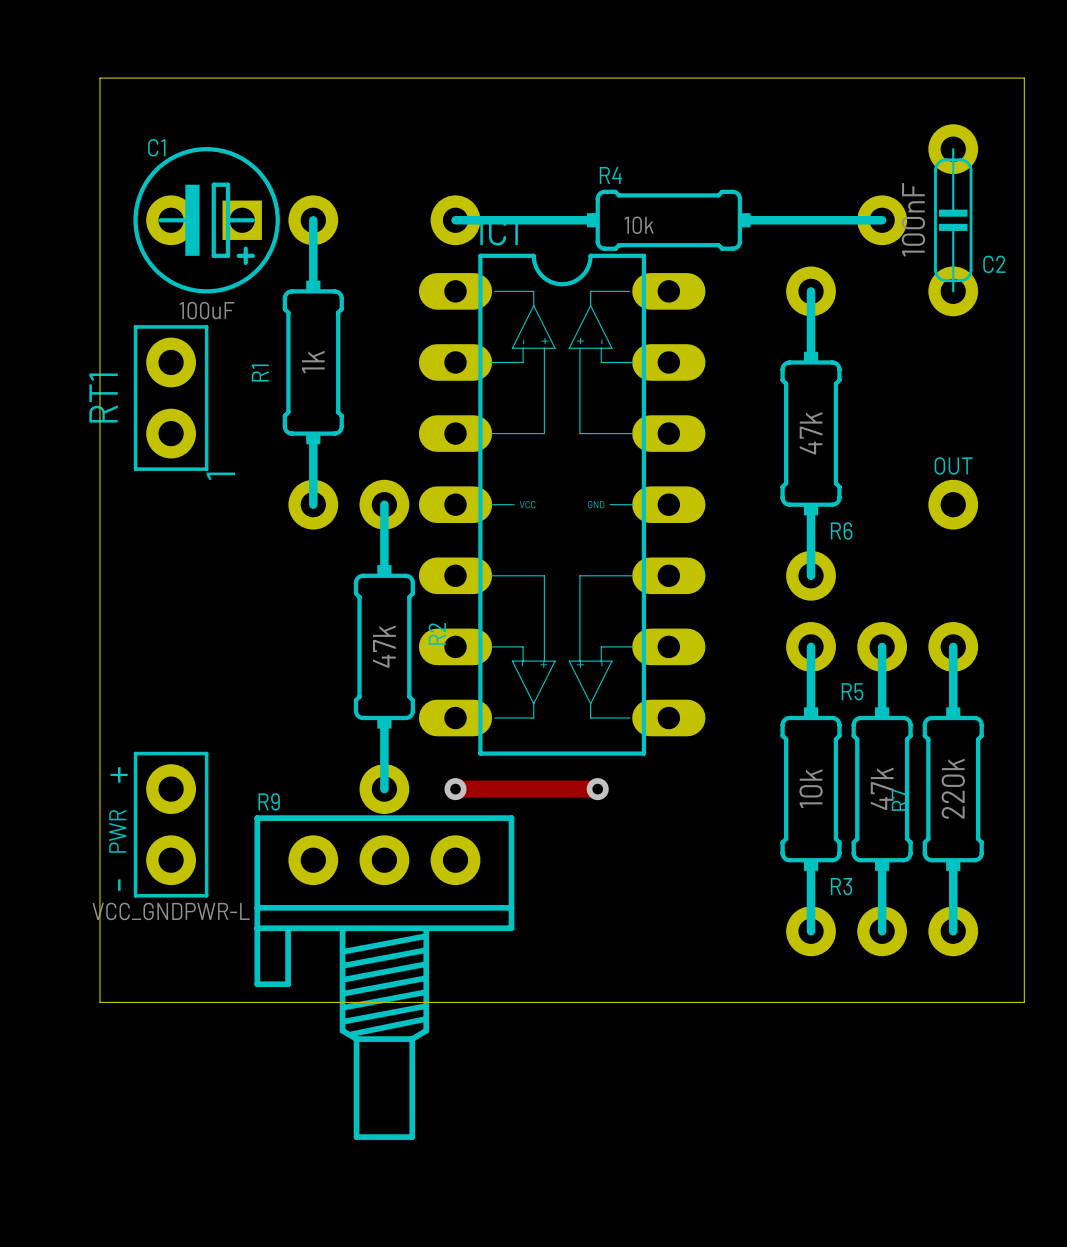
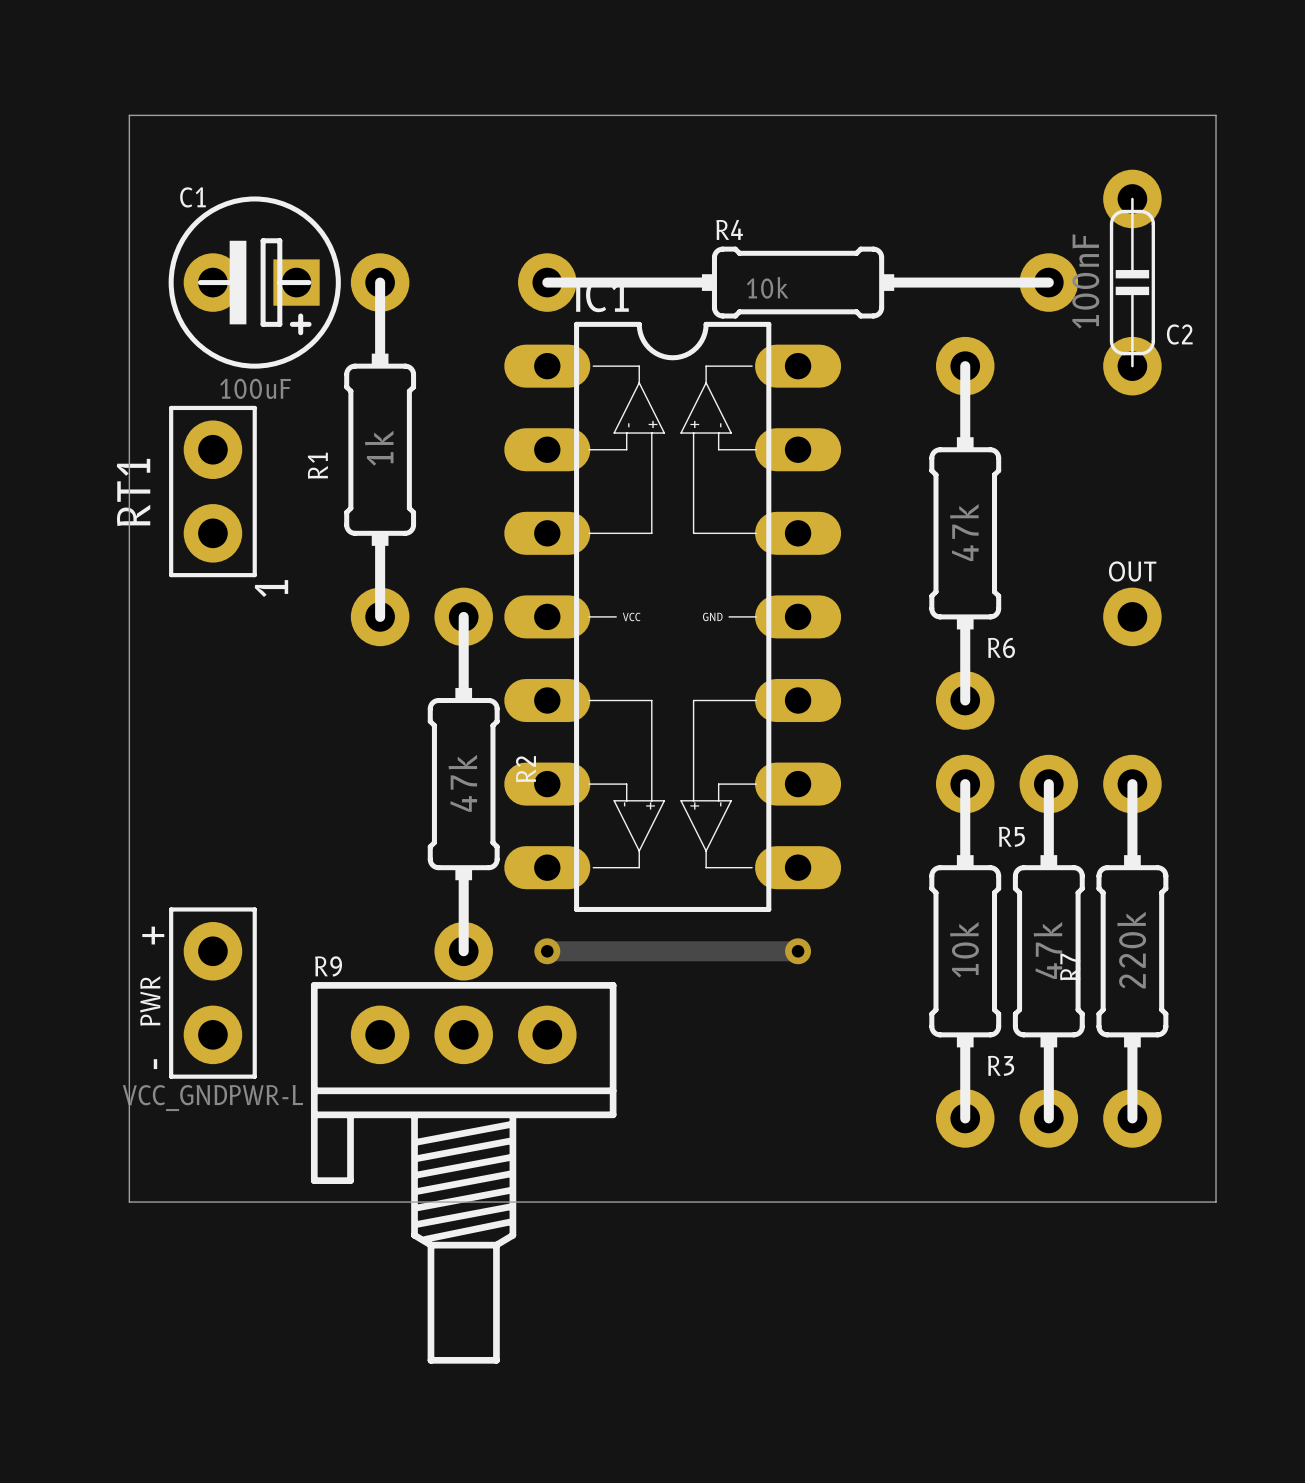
track: none -> (714, 951) (798, 951)
via position: (597, 789) -> (798, 951)

